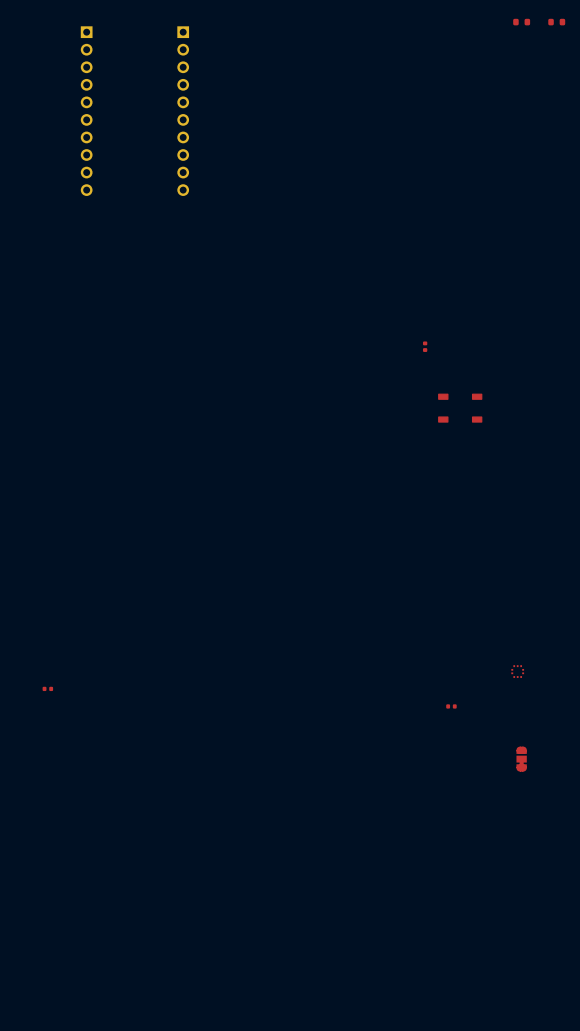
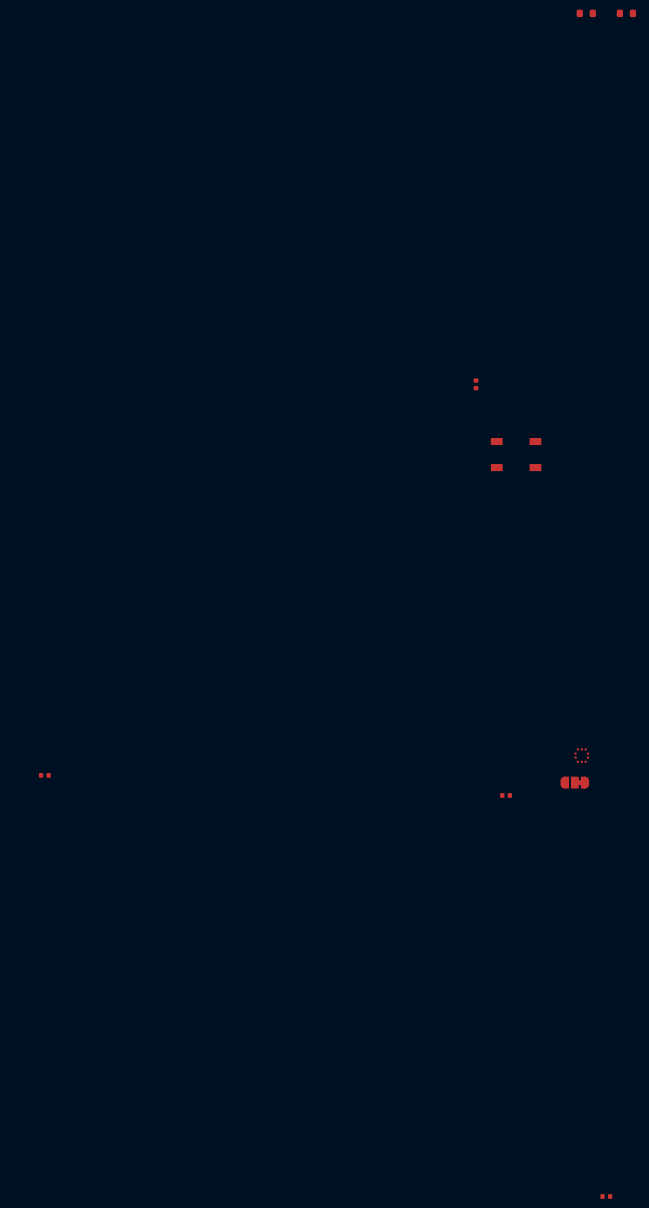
part: (86, 111) -> none
part: (183, 111) -> none
part rotation: 0° (521, 759) -> 90° counterclockwise (574, 782)
part position: (521, 759) -> (574, 782)

